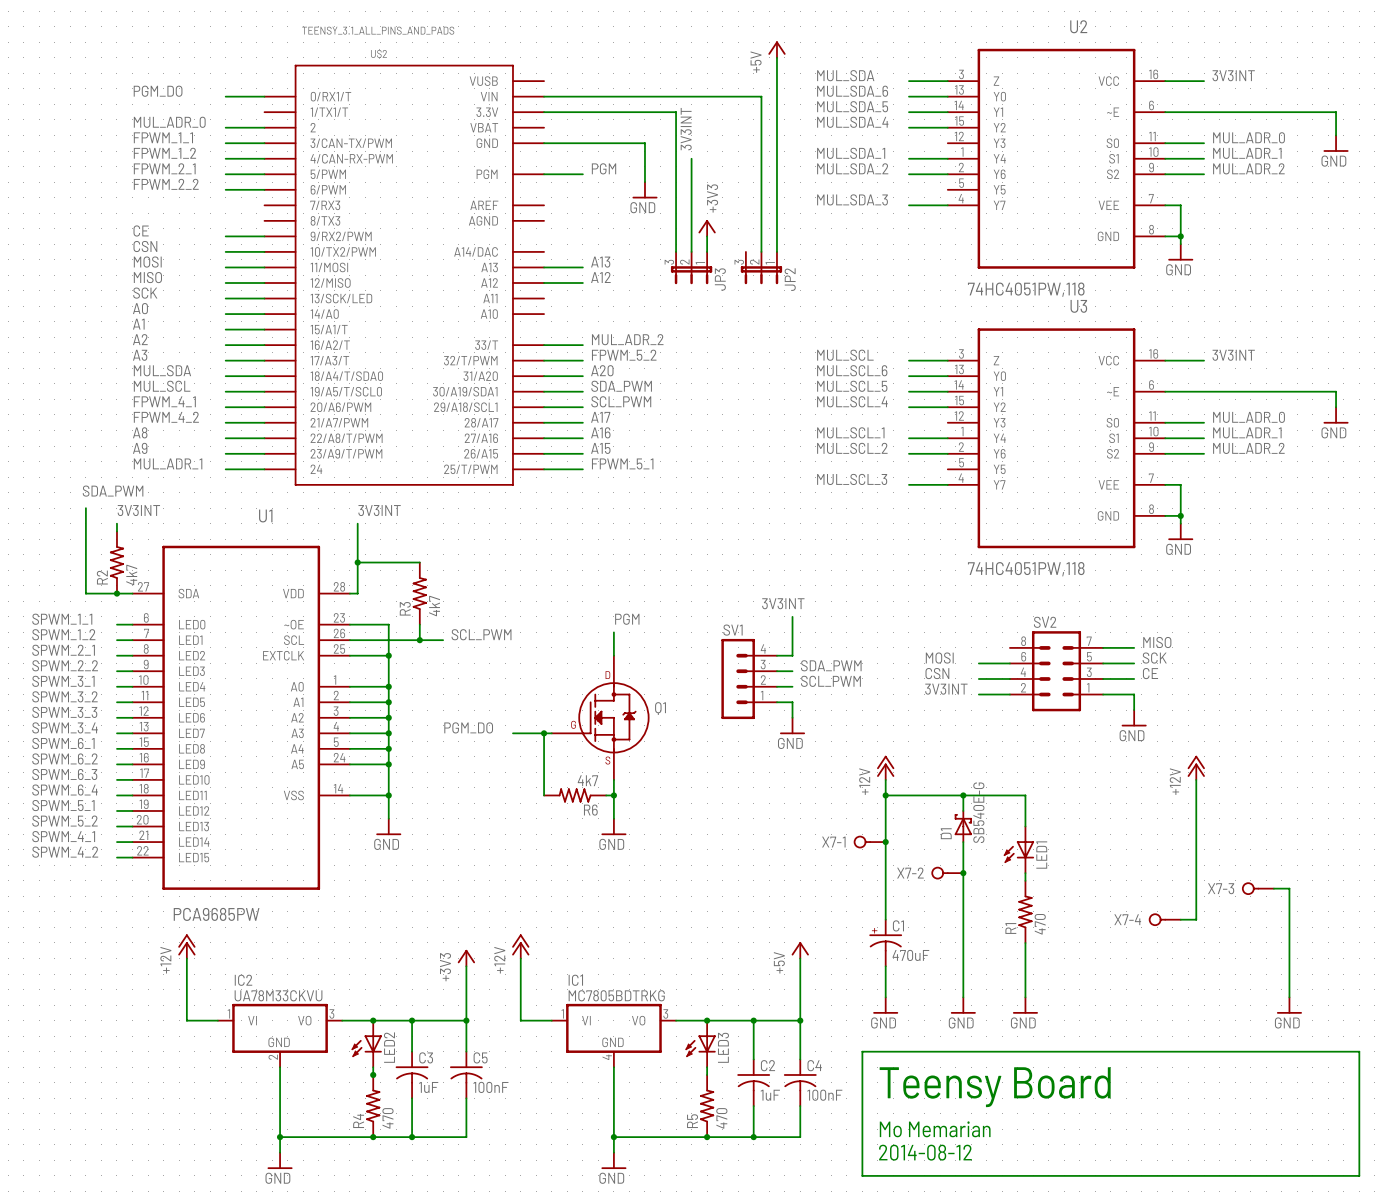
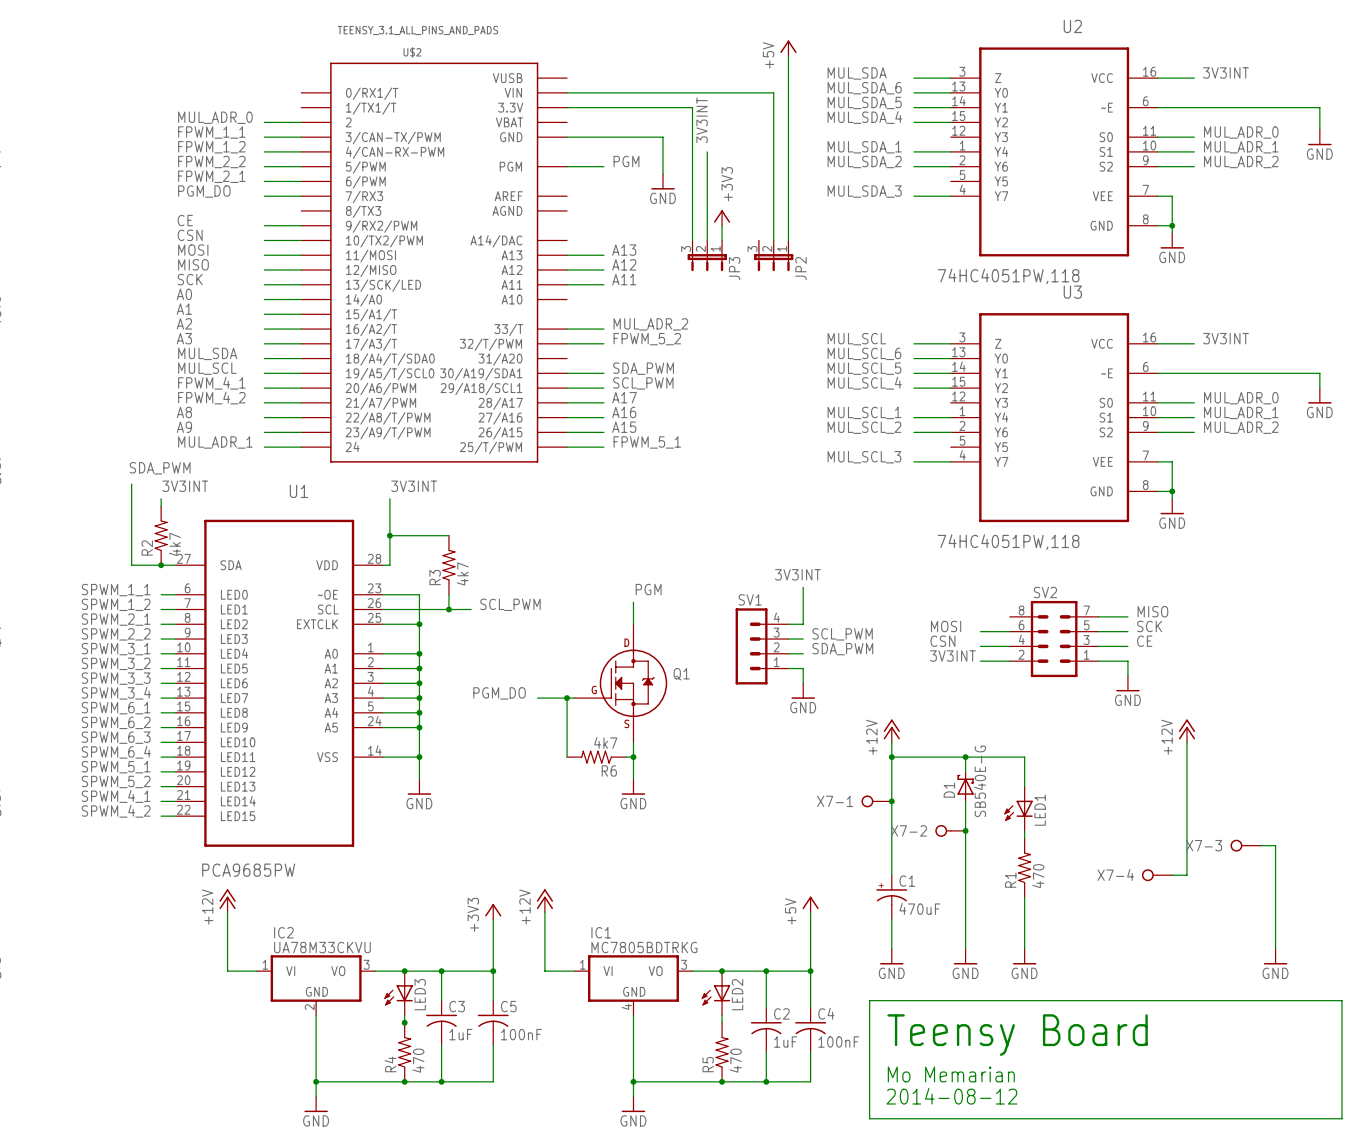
label position: PGM_DO (158, 91) -> PGM_DO (204, 191)
wire: (225, 96) (264, 96) -> (264, 196) (301, 196)
label: FPWM_2_1 (164, 168) -> FPWM_2_2 (211, 162)
label: FPWM_2_2 (166, 184) -> FPWM_2_1 (211, 176)
label: none -> A11 (624, 279)
label: A20 (602, 370) -> none
wire: (544, 376) (582, 376) -> (567, 284) (603, 284)
label: SDA_PWM (831, 665) -> SCL_PWM (842, 634)
label: SCL_PWM (830, 681) -> SDA_PWM (842, 649)
LED2 name: LED2 (389, 1047) -> LED3 (420, 994)
LED3 name: LED3 (723, 1047) -> LED2 (737, 994)

